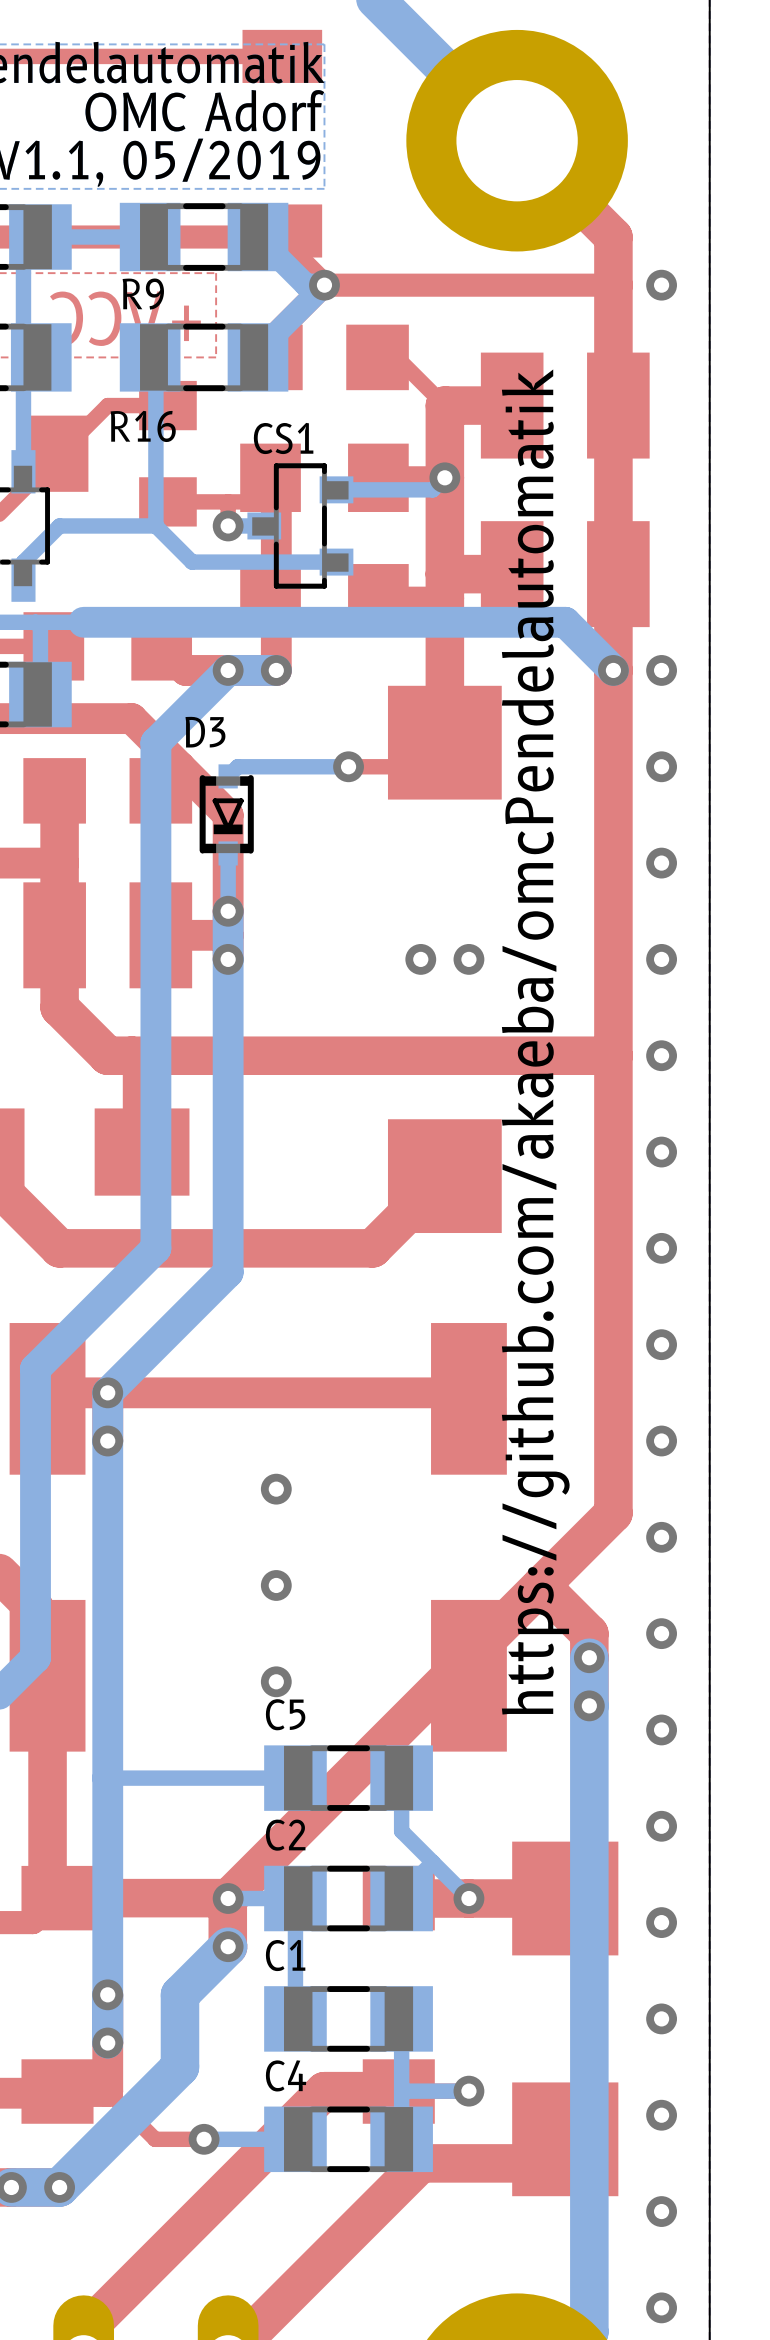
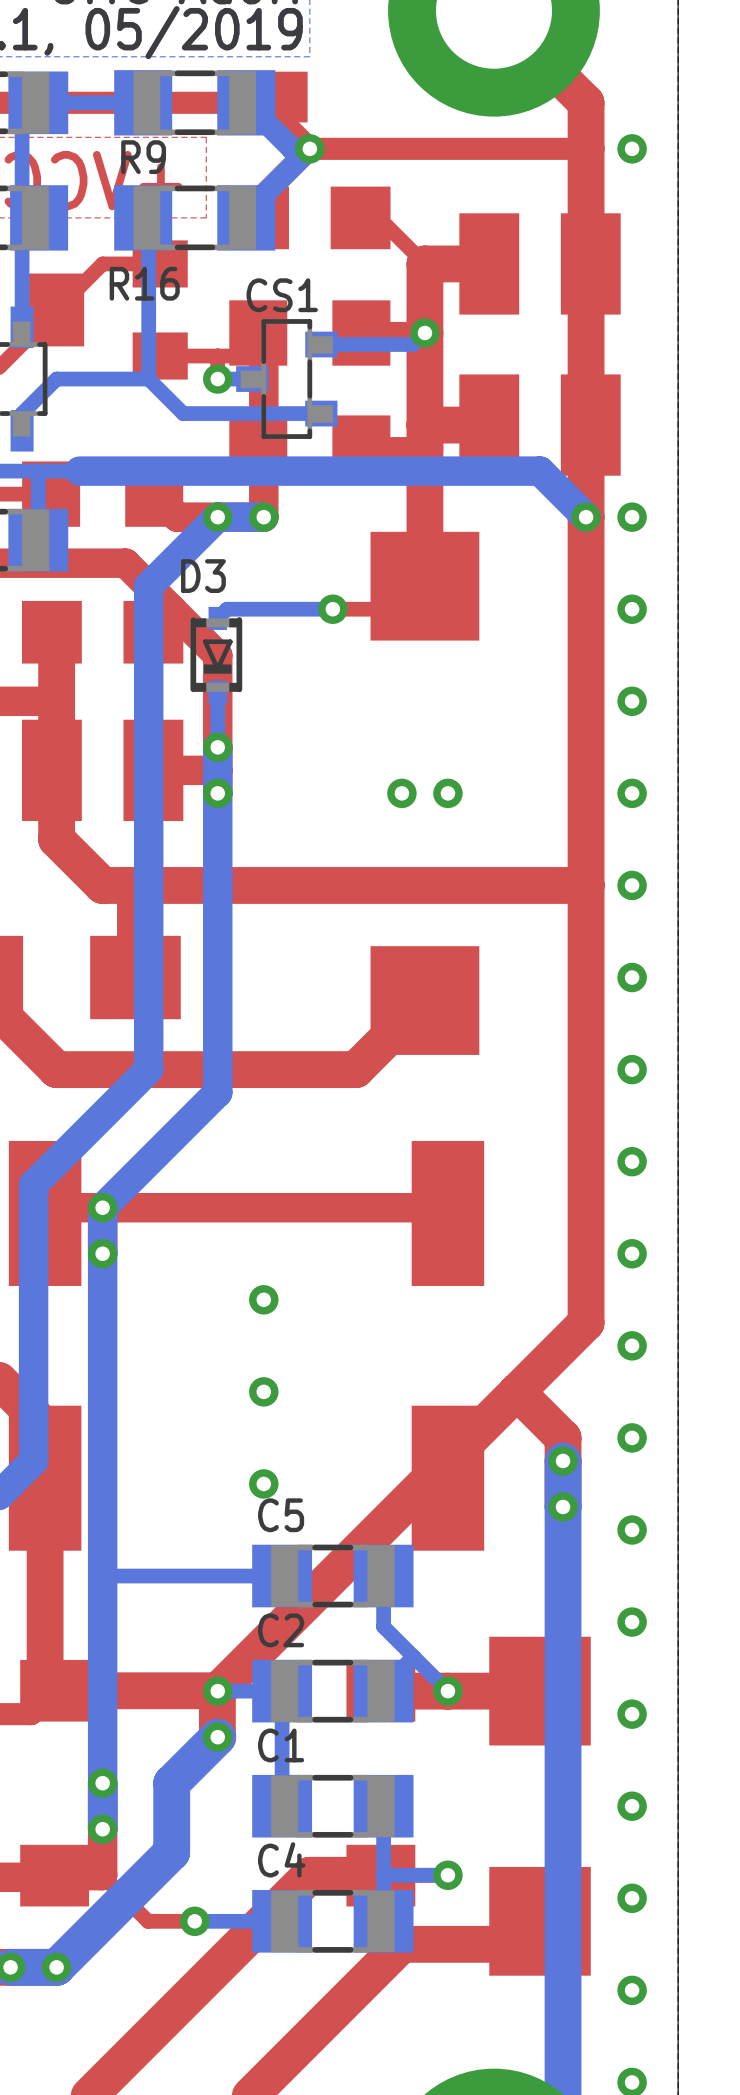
text: https://github.com/akaeba/omcPendelautomatik (535, 1041) -> none

